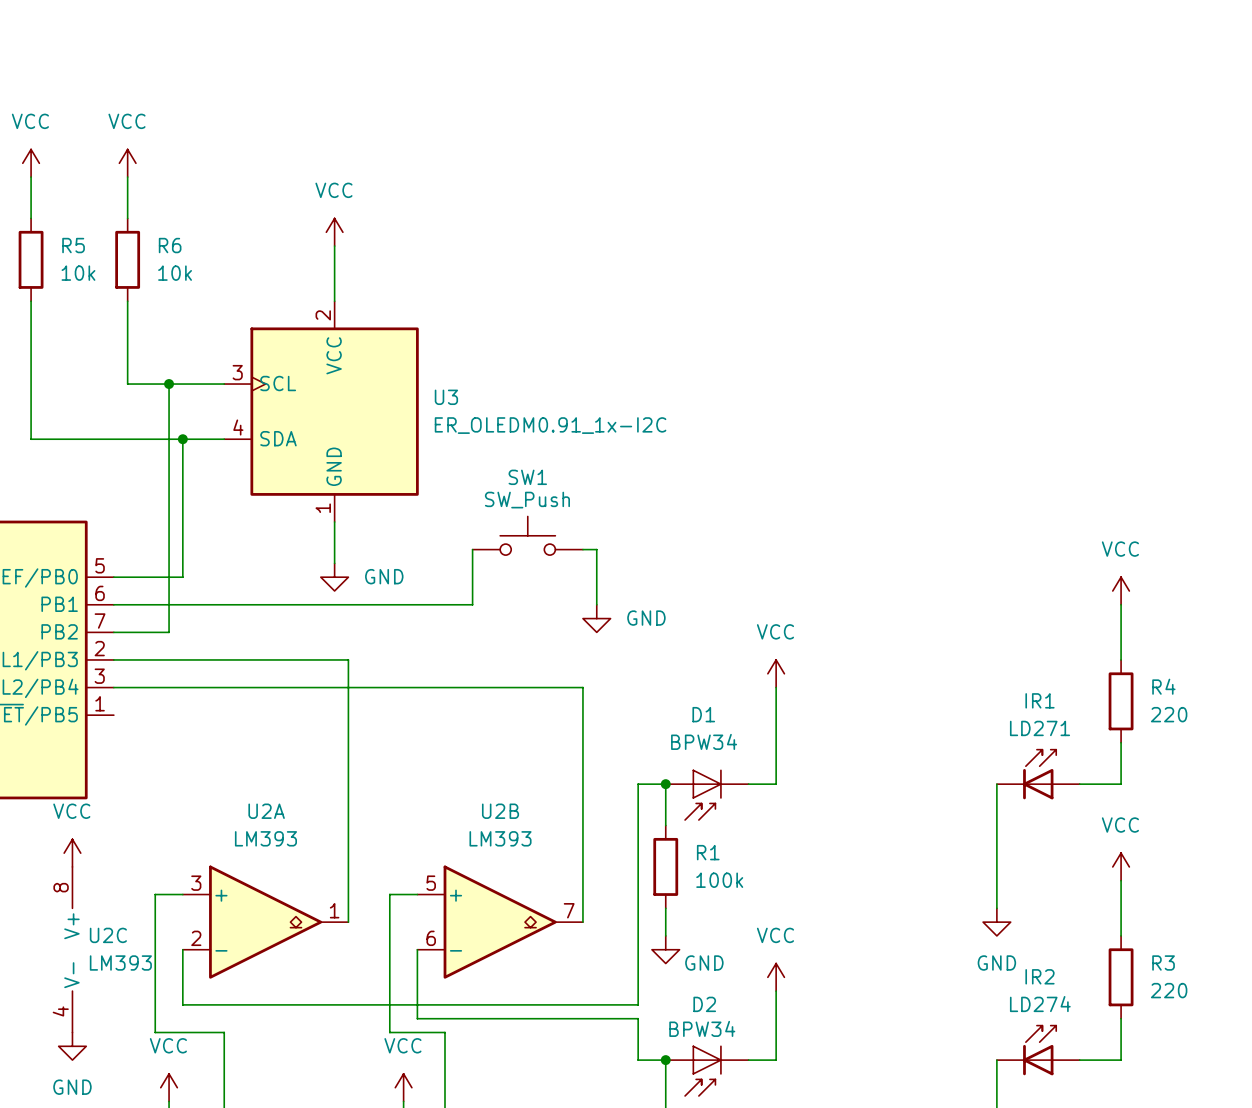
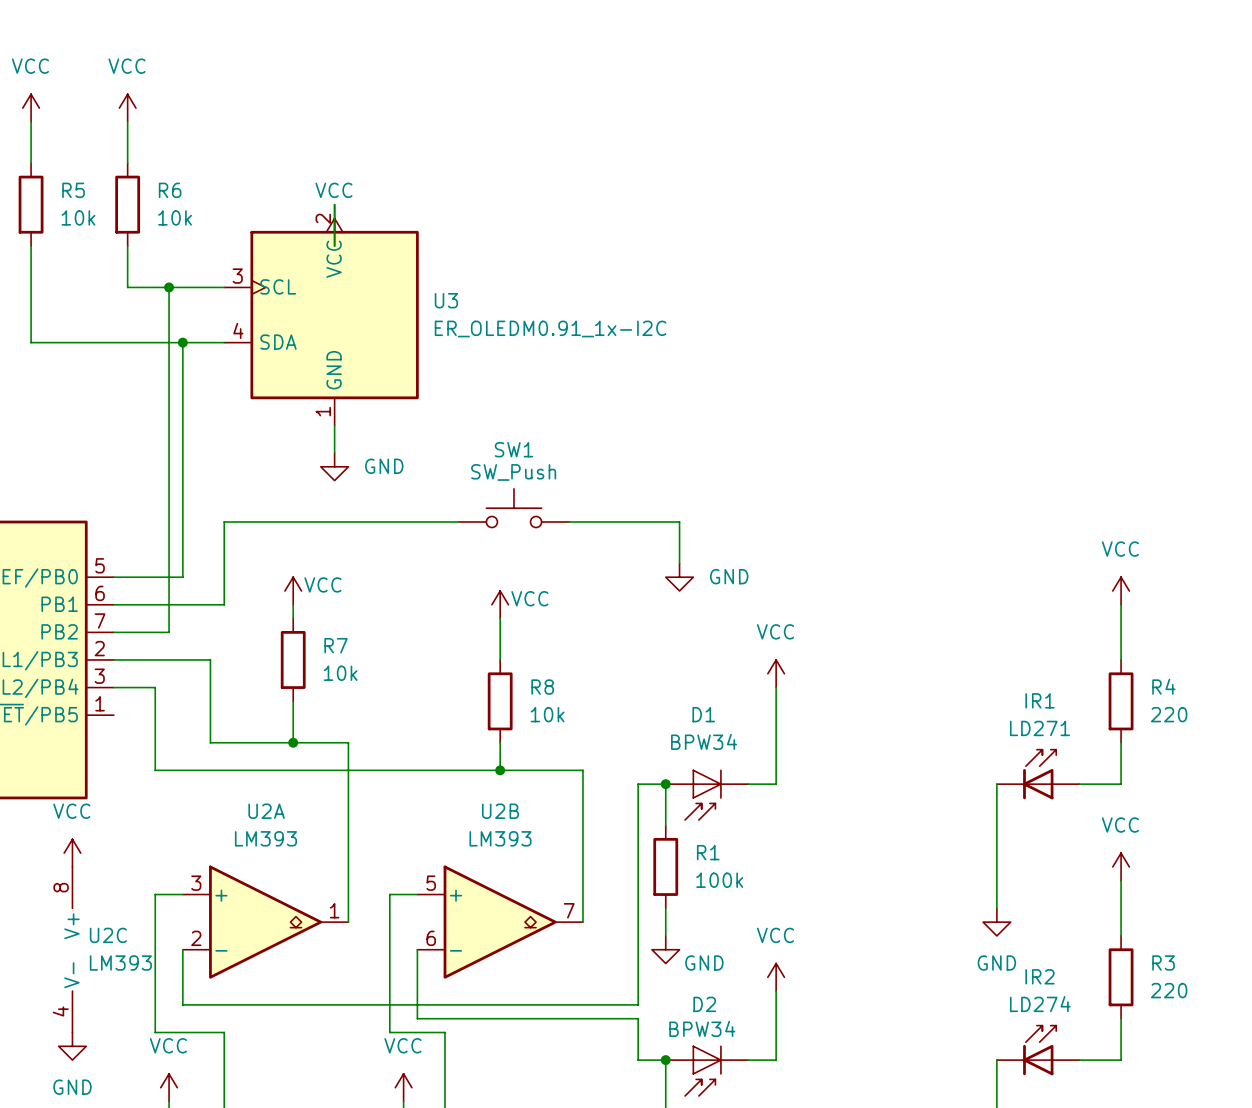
power symbol position: VCC (31, 163) -> VCC (31, 108)
power symbol position: VCC (127, 163) -> VCC (127, 108)
wire: (31, 177) (31, 218) -> (31, 121) (31, 163)
wire: (127, 177) (127, 218) -> (127, 121) (127, 163)
wire: none -> (31, 246) (31, 301)
wire: none -> (127, 246) (127, 287) (224, 287)
R5 position: (31, 259) -> (31, 204)
R6 position: (127, 259) -> (127, 204)
wire: none -> (169, 287) (169, 384)
junction: none -> (169, 287)
wire: (127, 301) (127, 384) (224, 384) -> none
wire: (31, 342) (31, 439) (224, 439) -> (31, 342) (224, 342)
wire: none -> (182, 342) (182, 439)
junction position: (169, 384) -> (182, 342)
U3 position: (321, 411) -> (321, 315)
junction: (182, 439) -> none
wire: (334, 522) (334, 563) -> (293, 701) (293, 742)
wire: none -> (569, 522) (679, 522) (679, 563)
SW1 position: (527, 535) -> (513, 508)
wire: (472, 549) (472, 604) (224, 604) -> (458, 522) (224, 522) (224, 604)
wire: (582, 549) (596, 549) (596, 604) -> none
power symbol position: GND (334, 577) -> GND (334, 466)
power symbol: none -> VCC (293, 590)
wire: none -> (293, 604) (293, 618)
power symbol: none -> VCC (500, 604)
wire: none -> (500, 618) (500, 659)
power symbol position: GND (596, 618) -> GND (679, 577)
wire: (210, 659) (348, 659) (348, 742) -> (210, 659) (210, 742) (348, 742)
R7: none -> 10k (293, 659)
wire: (155, 687) (582, 687) (582, 770) -> (155, 687) (155, 770) (582, 770)
R8: none -> 10k (500, 701)
junction: none -> (293, 742)
wire: none -> (500, 742) (500, 770)
junction: none -> (500, 770)

